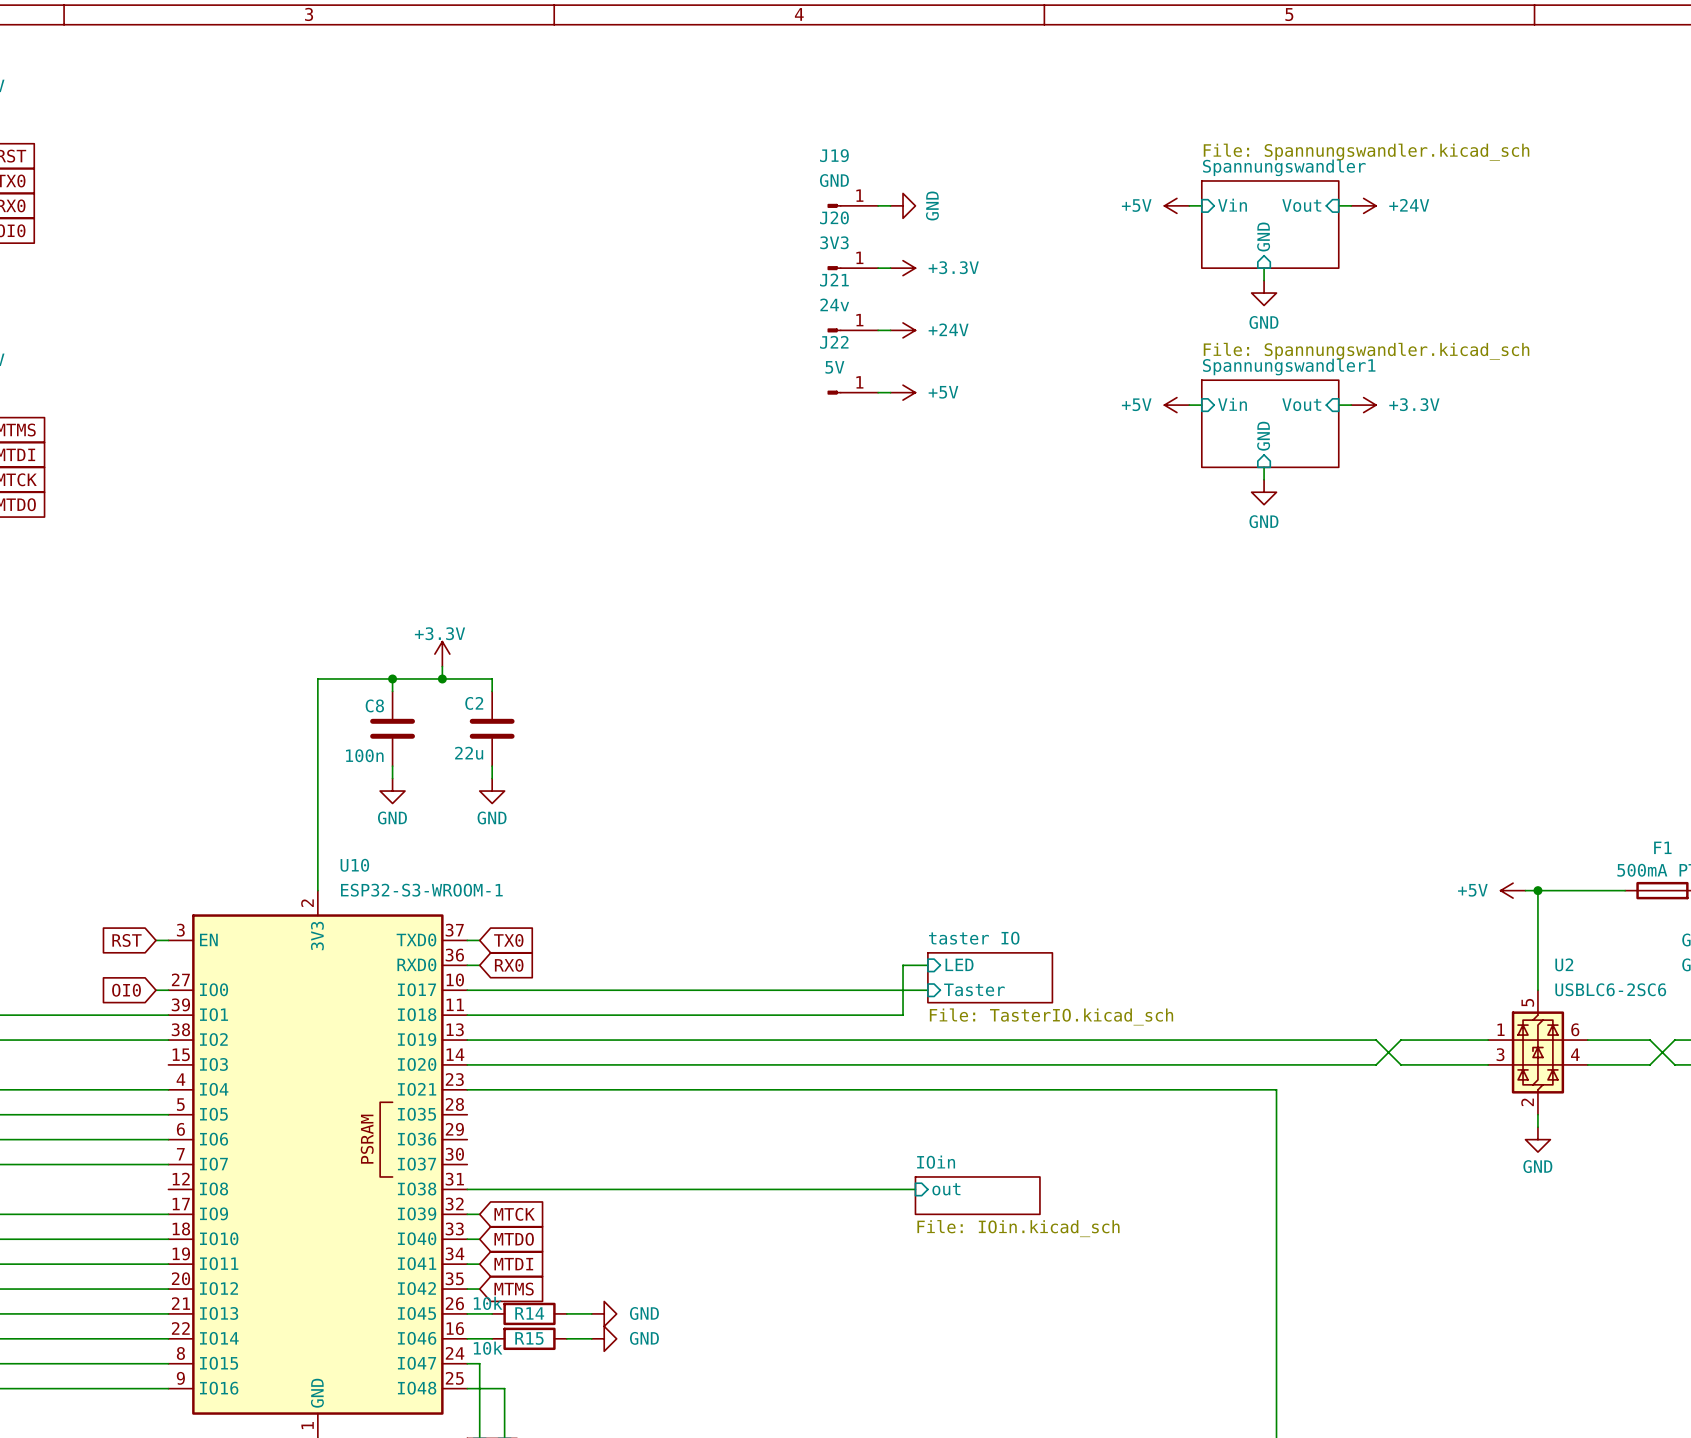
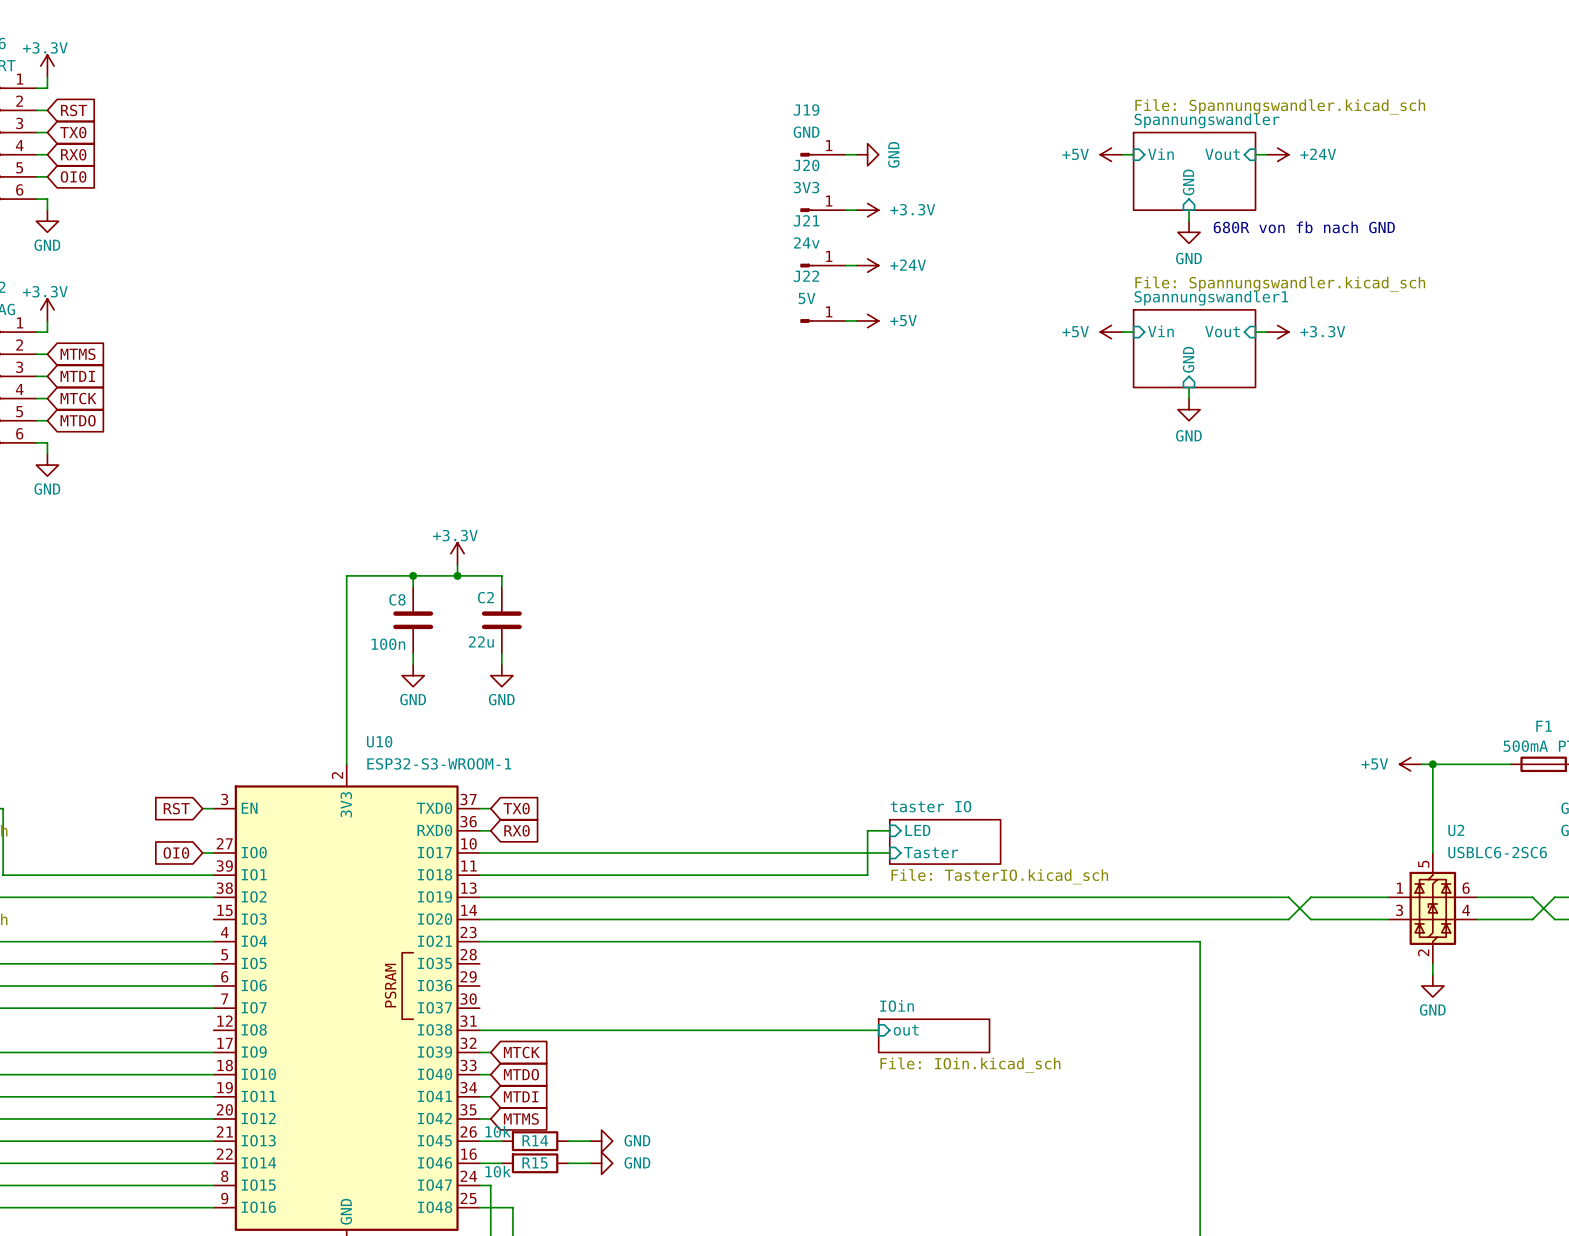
text: none -> 680R von fb nach GND (1304, 227)

